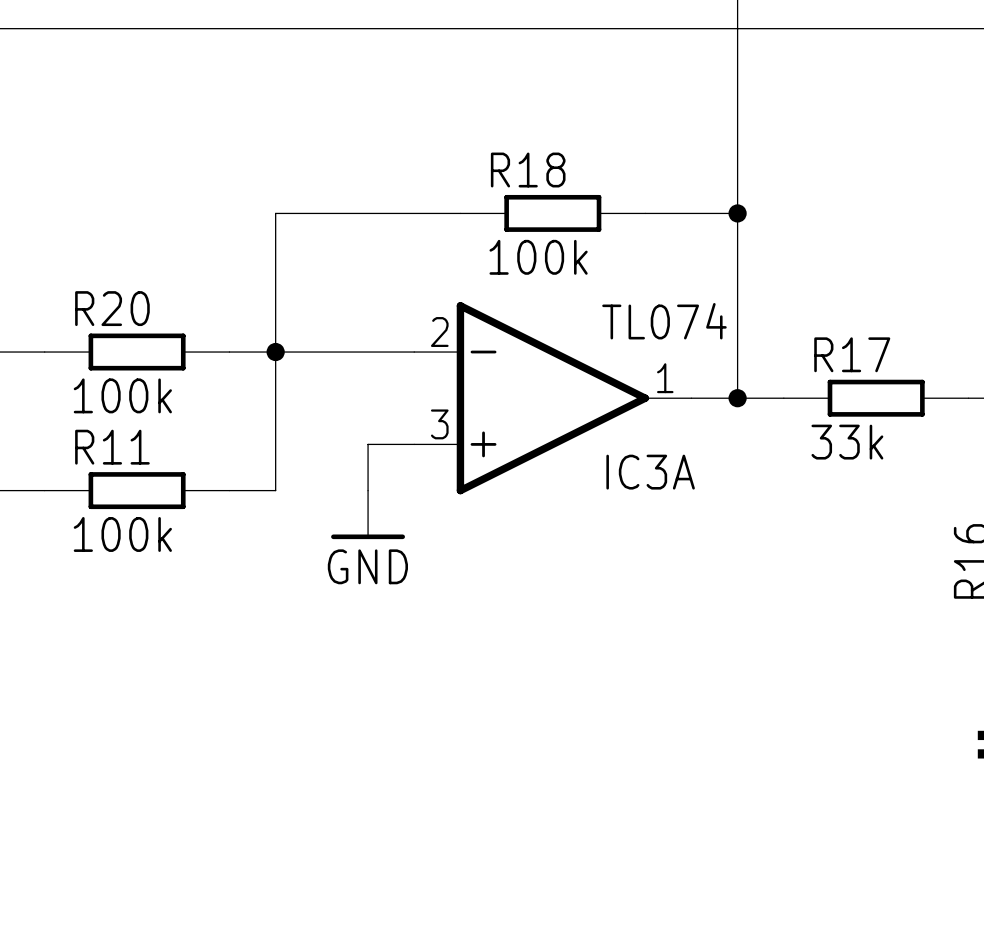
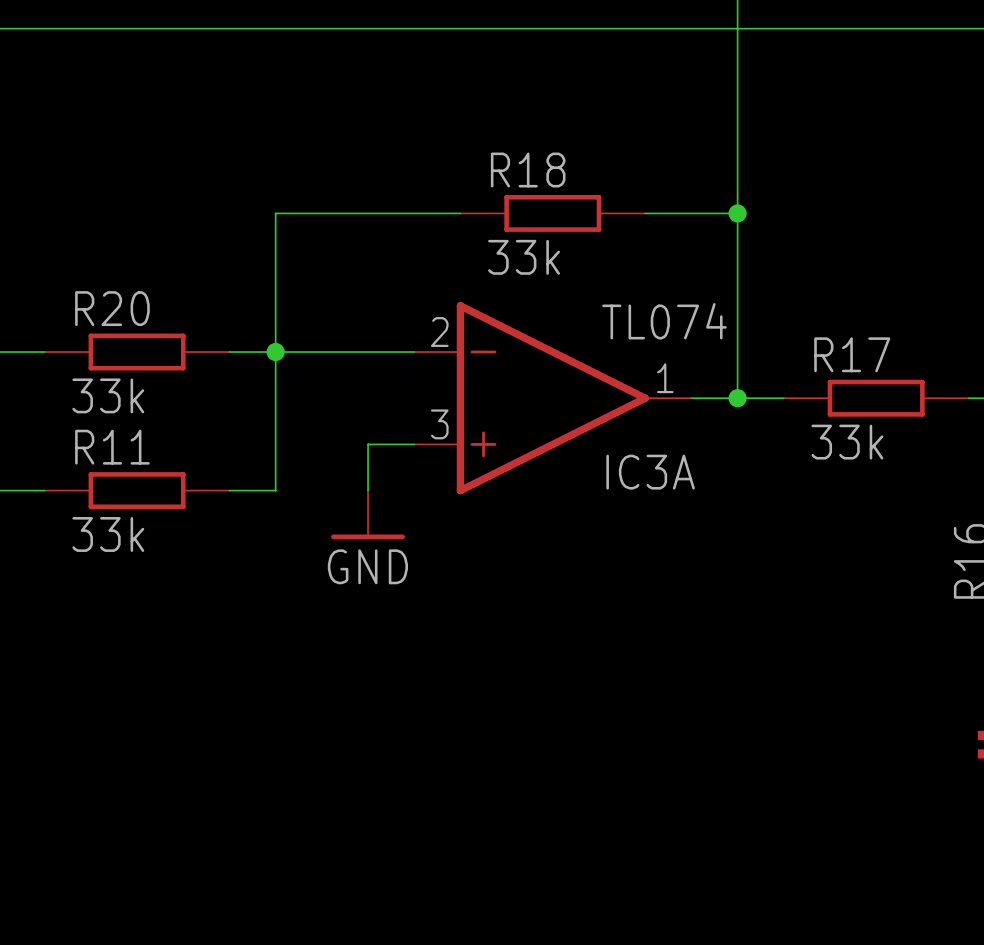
R18 value: 100k (538, 257) -> 33k (524, 257)
R20 value: 100k (122, 395) -> 33k (108, 395)
R11 value: 100k (122, 534) -> 33k (108, 534)

